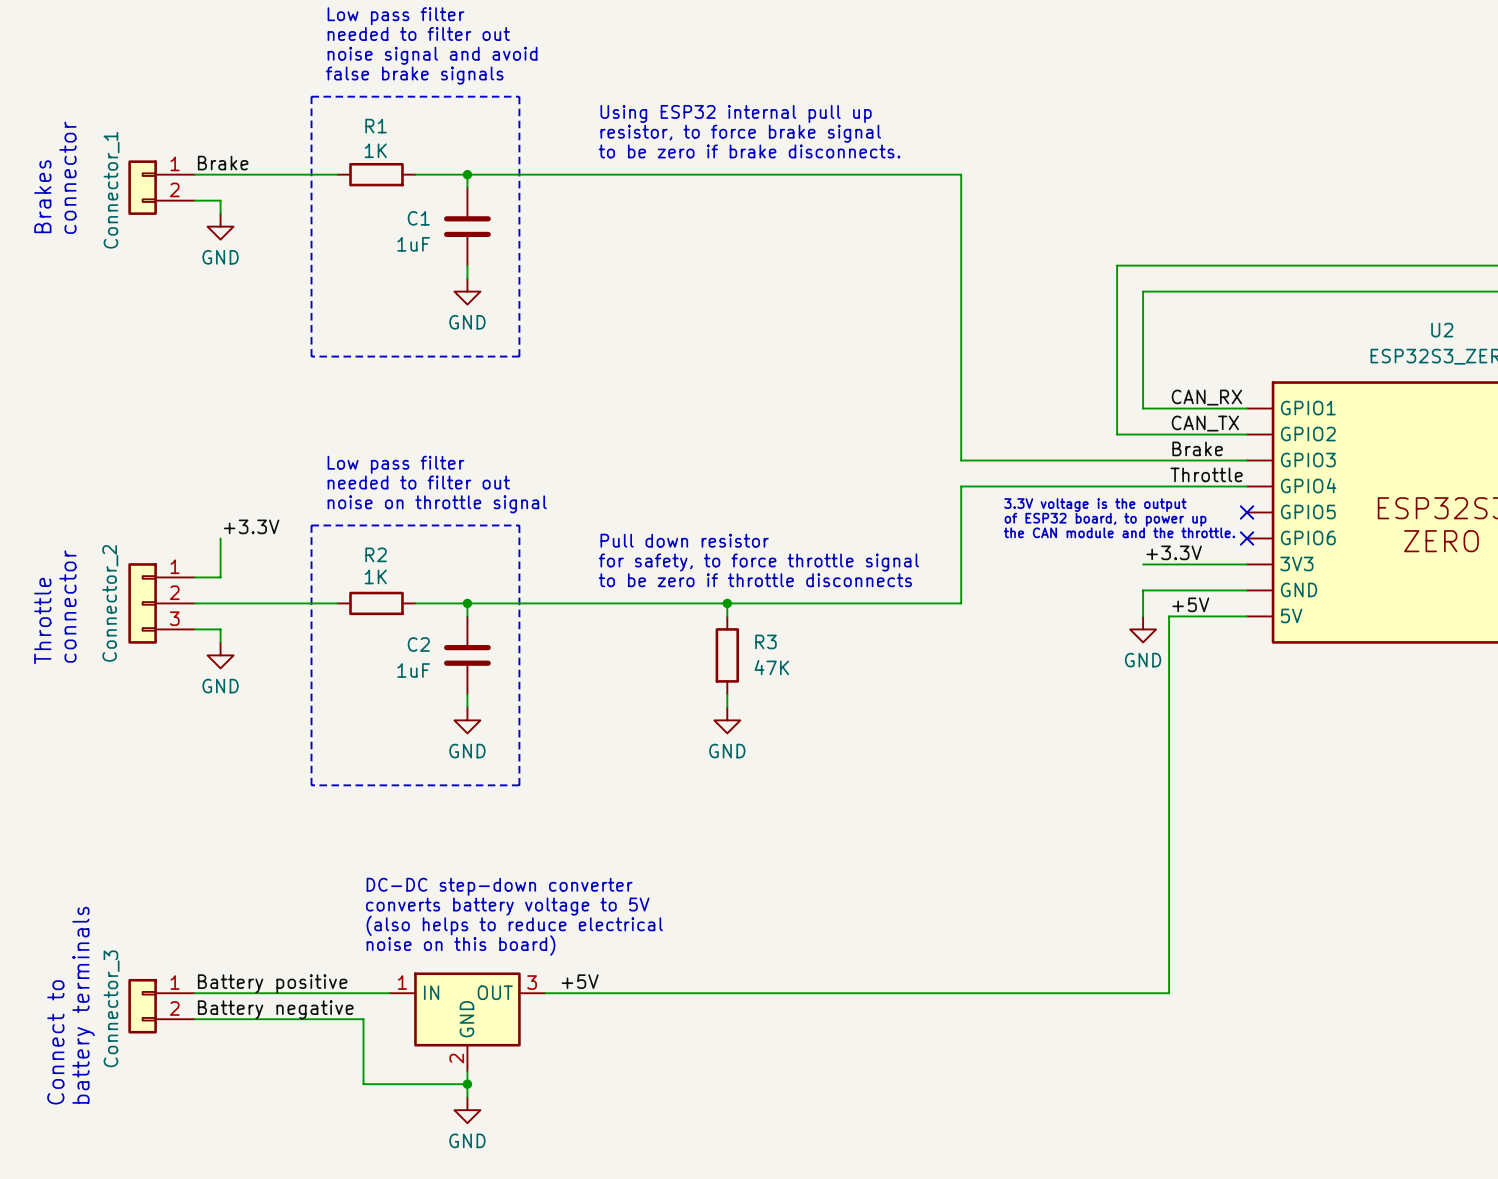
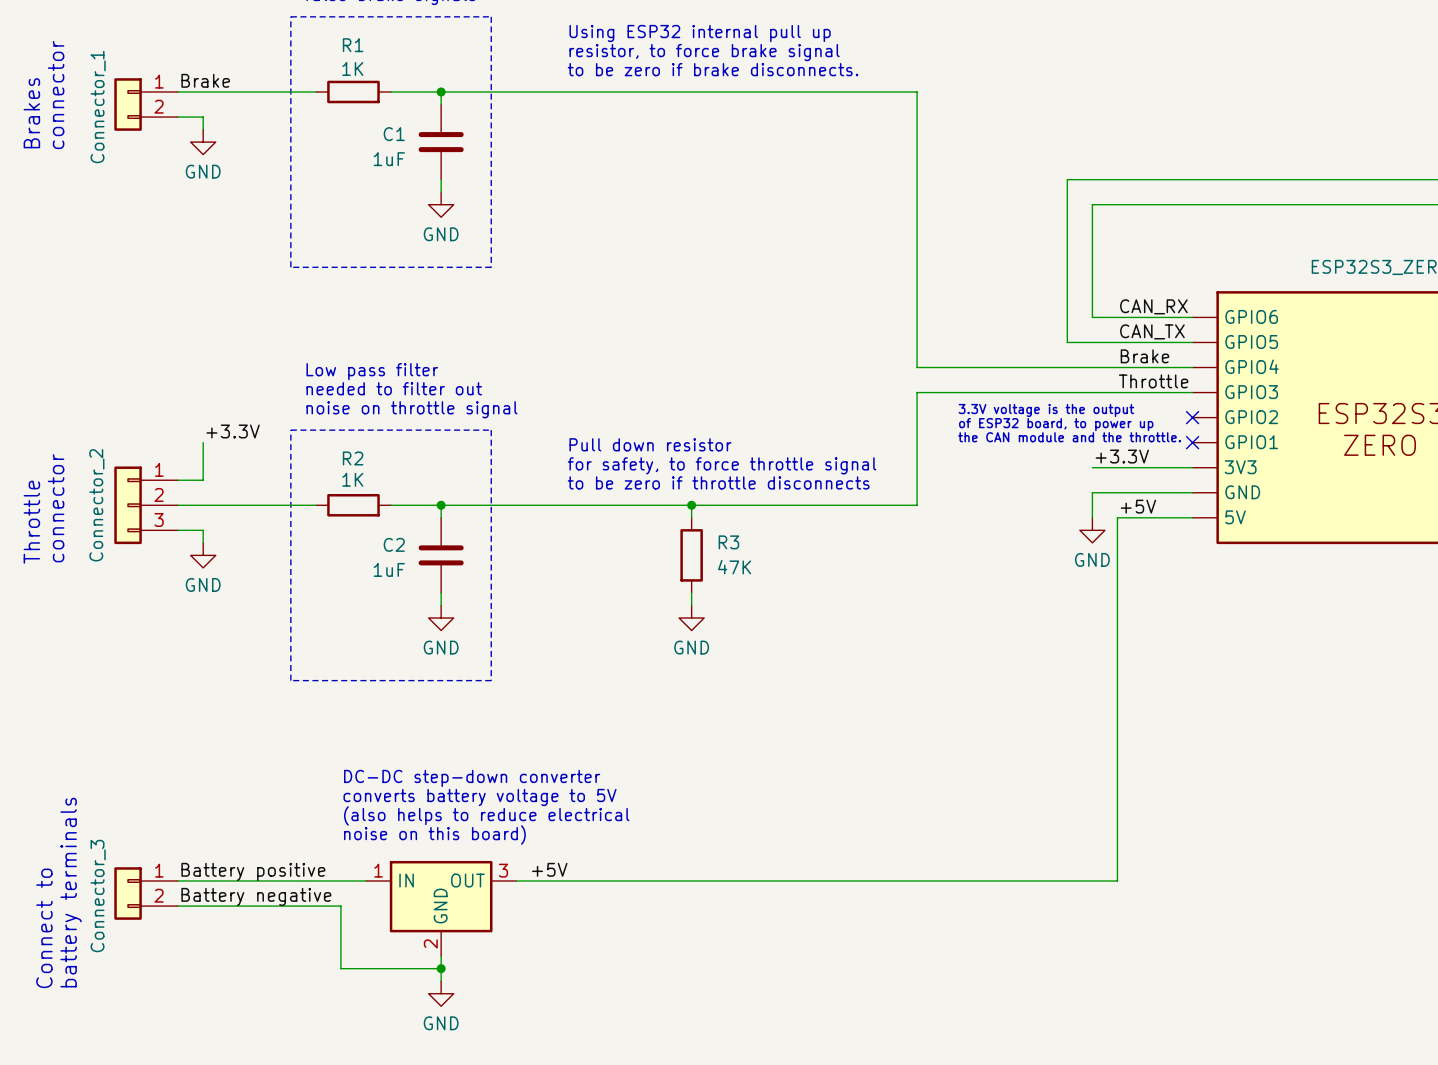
U2 name: U2 (1442, 330) -> none
U2 pin name: GPIO1 (1308, 408) -> GPIO6 (1251, 316)
U2 pin name: GPIO2 (1308, 434) -> GPIO5 (1251, 342)
U2 pin name: GPIO3 (1308, 460) -> GPIO4 (1251, 366)
U2 pin name: GPIO4 (1308, 485) -> GPIO3 (1251, 392)
U2 pin name: GPIO5 (1308, 512) -> GPIO2 (1251, 417)
U2 pin name: GPIO6 (1308, 537) -> GPIO1 (1251, 442)

